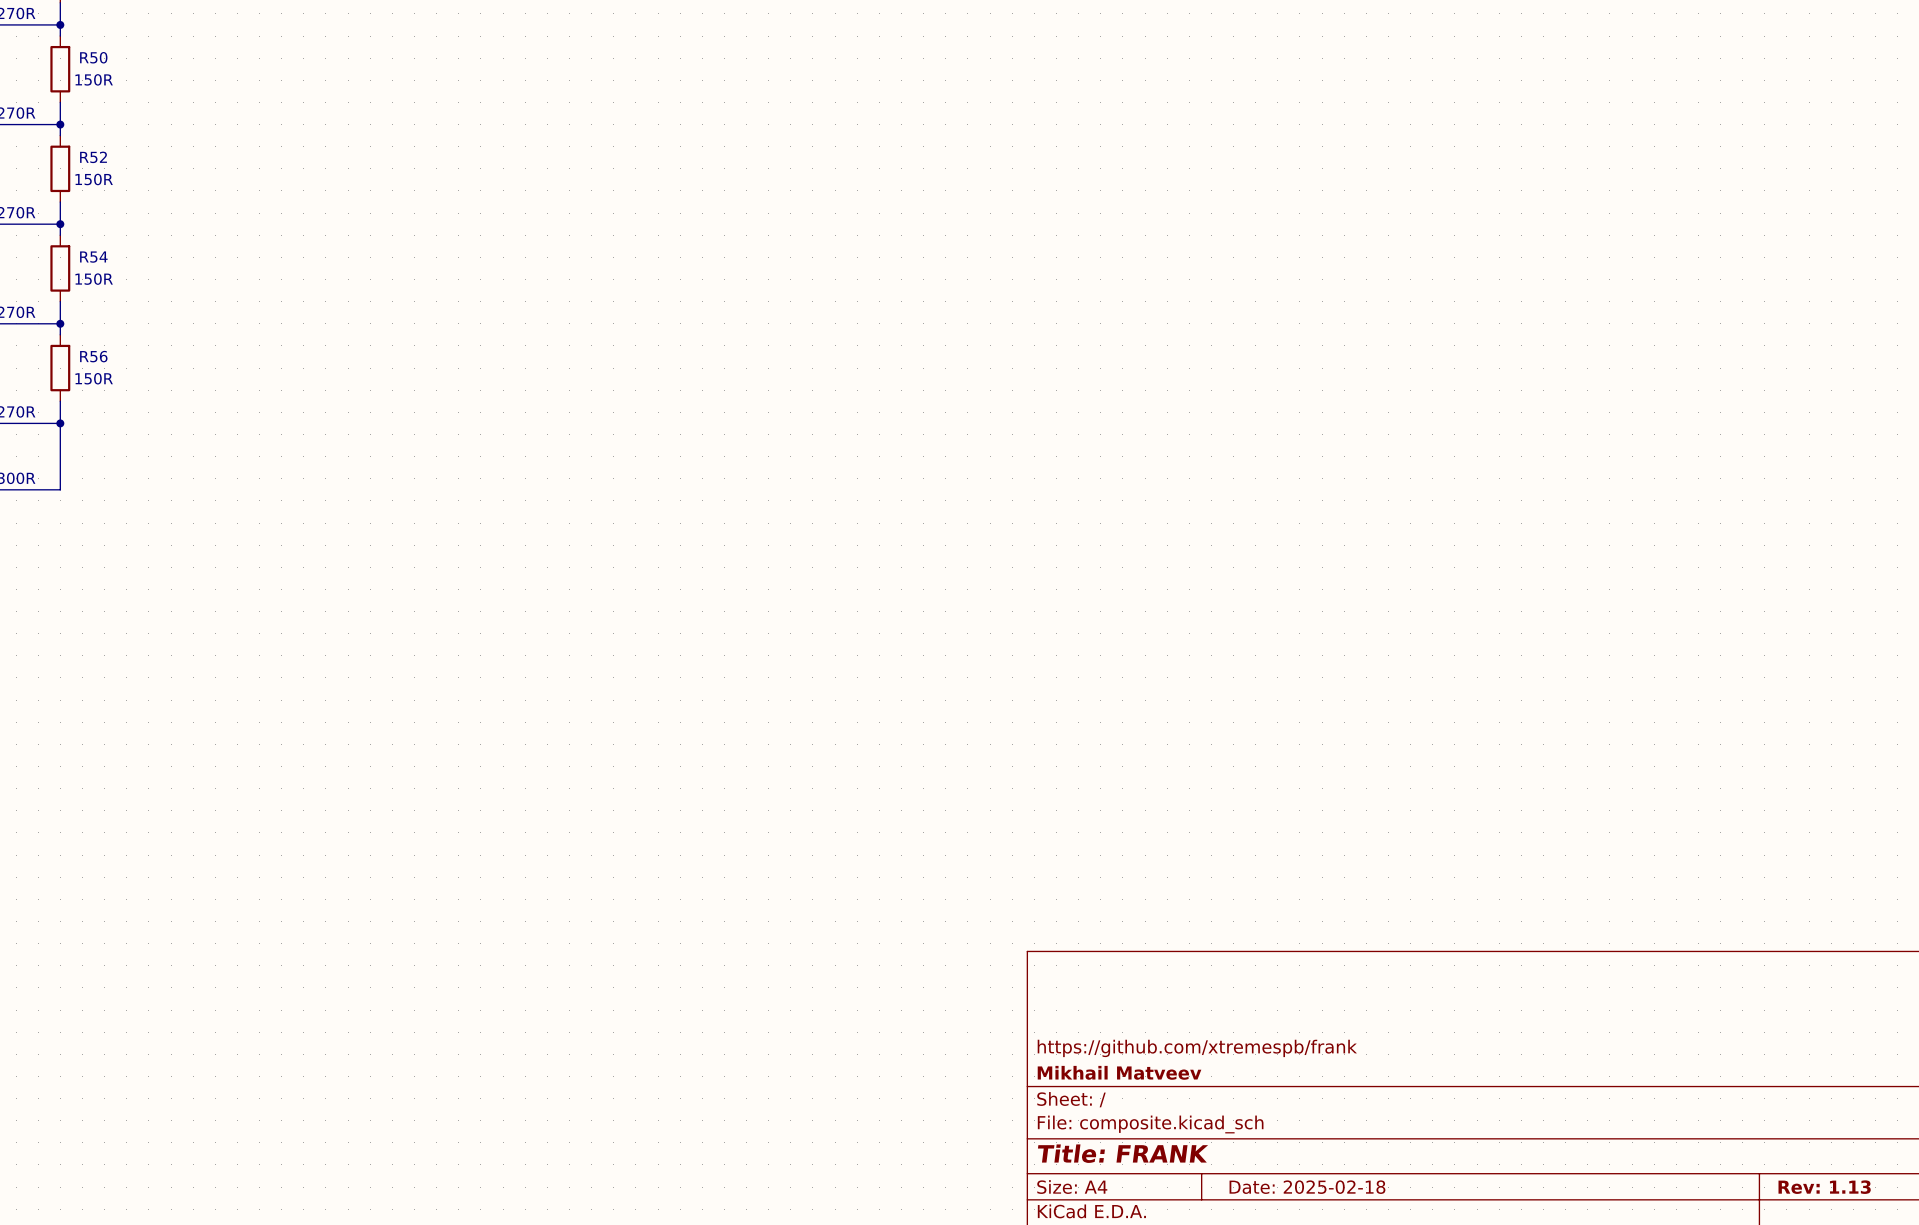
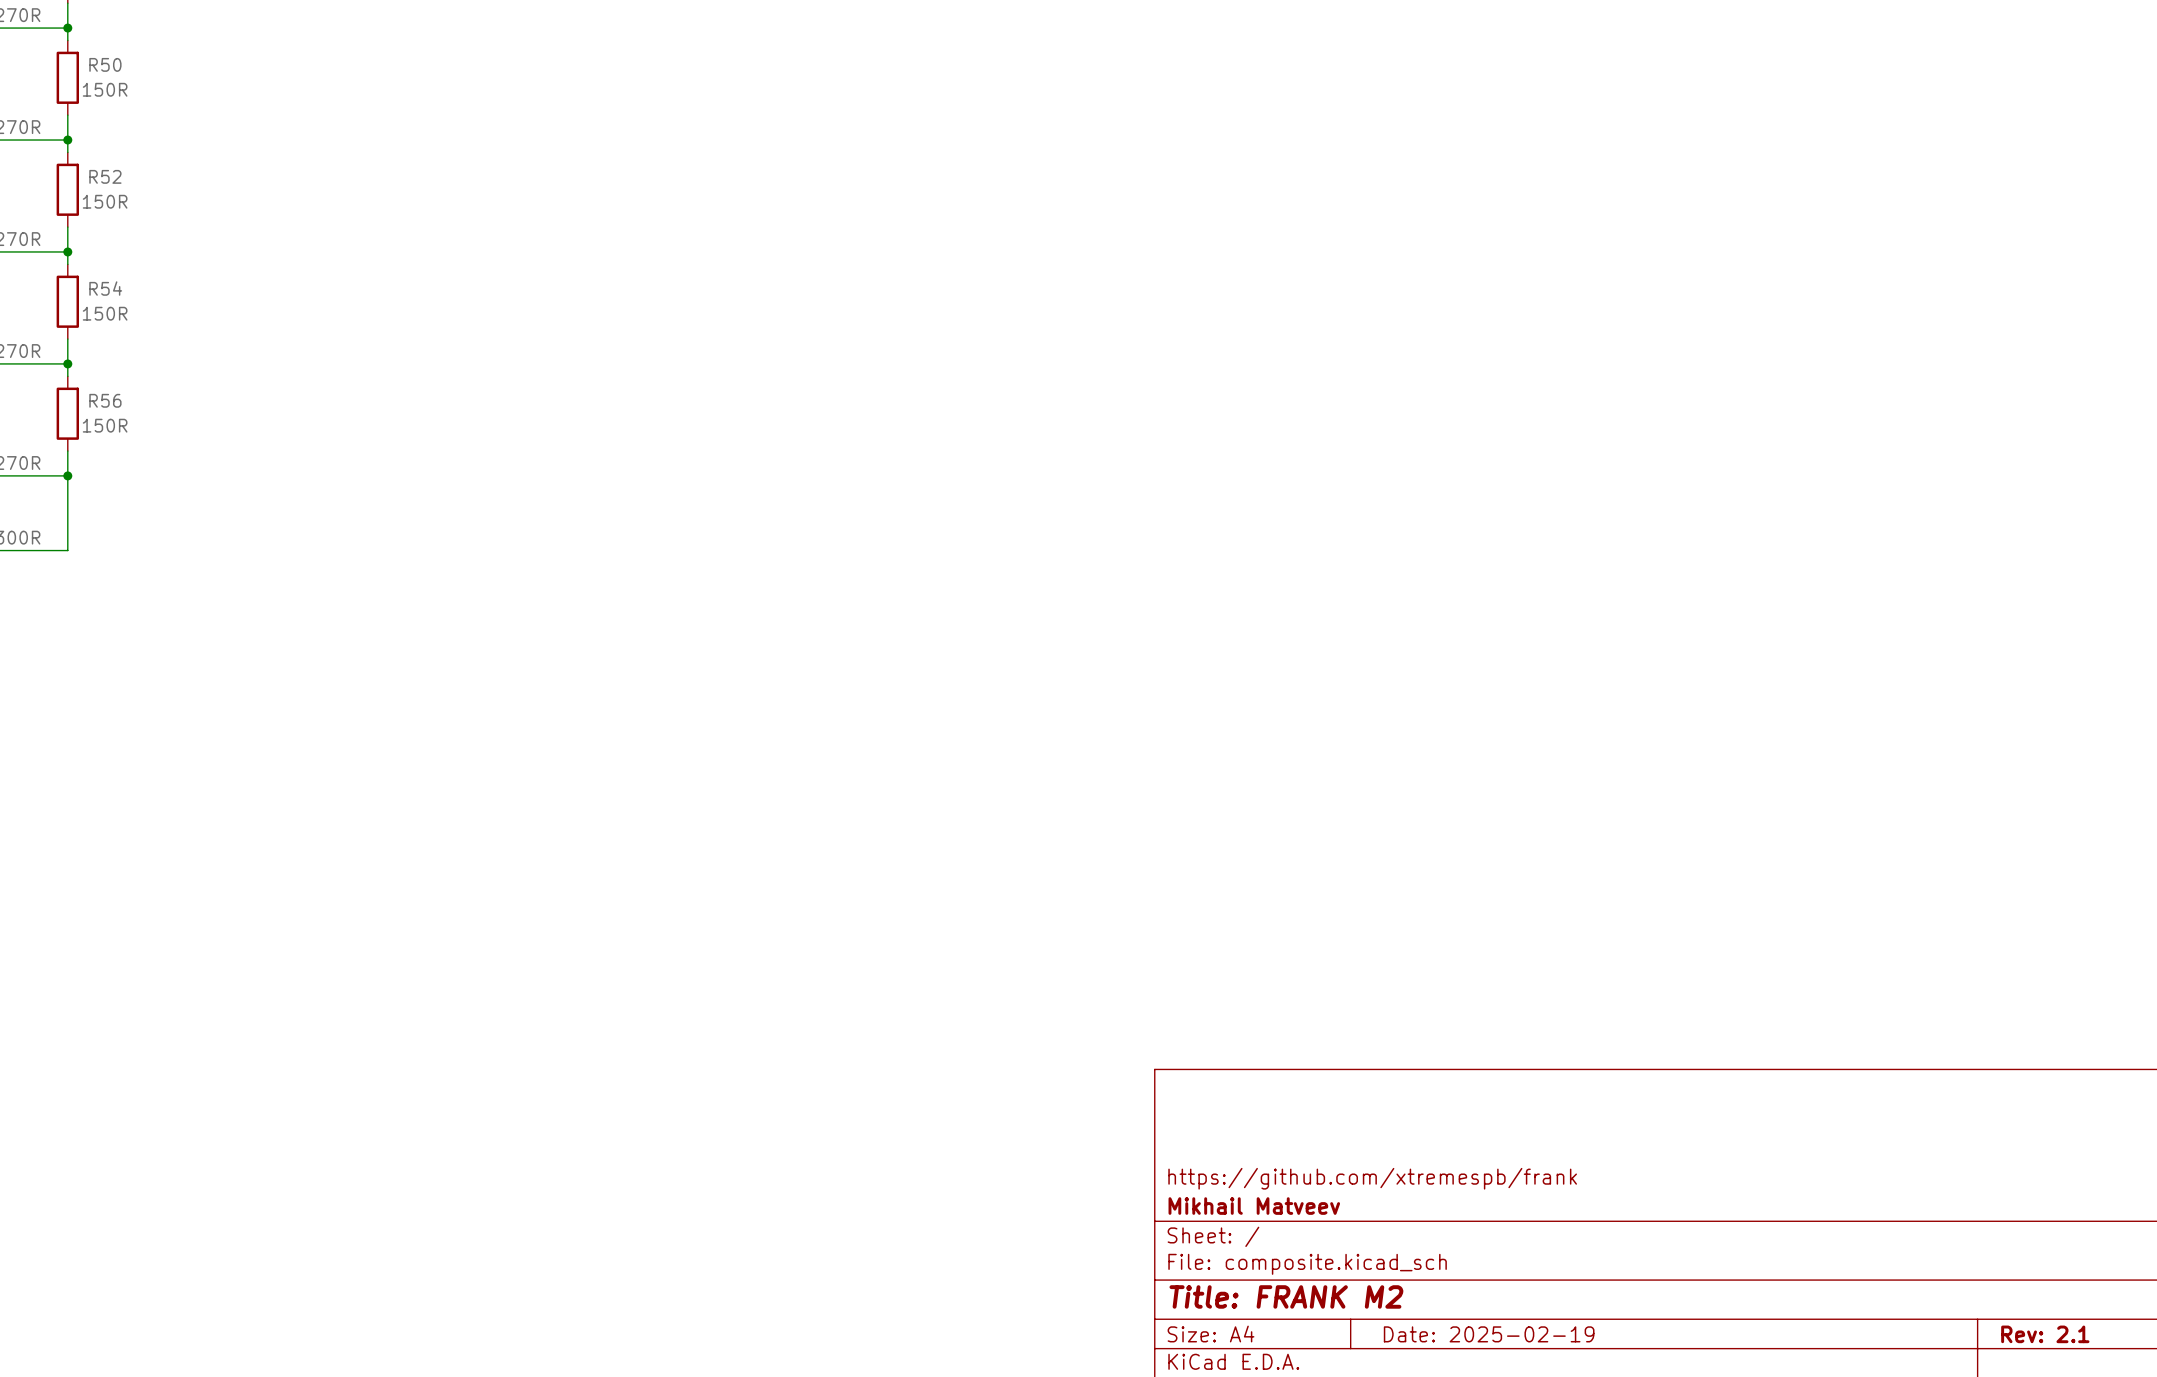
title block: Title: FRANK (1123, 1153) -> Title: FRANK M2 (1286, 1296)
title block: Date: 2025-02-18 (1307, 1187) -> Date: 2025-02-19 (1489, 1334)
title block: Rev: 1.13 (1824, 1187) -> Rev: 2.1 (2045, 1334)

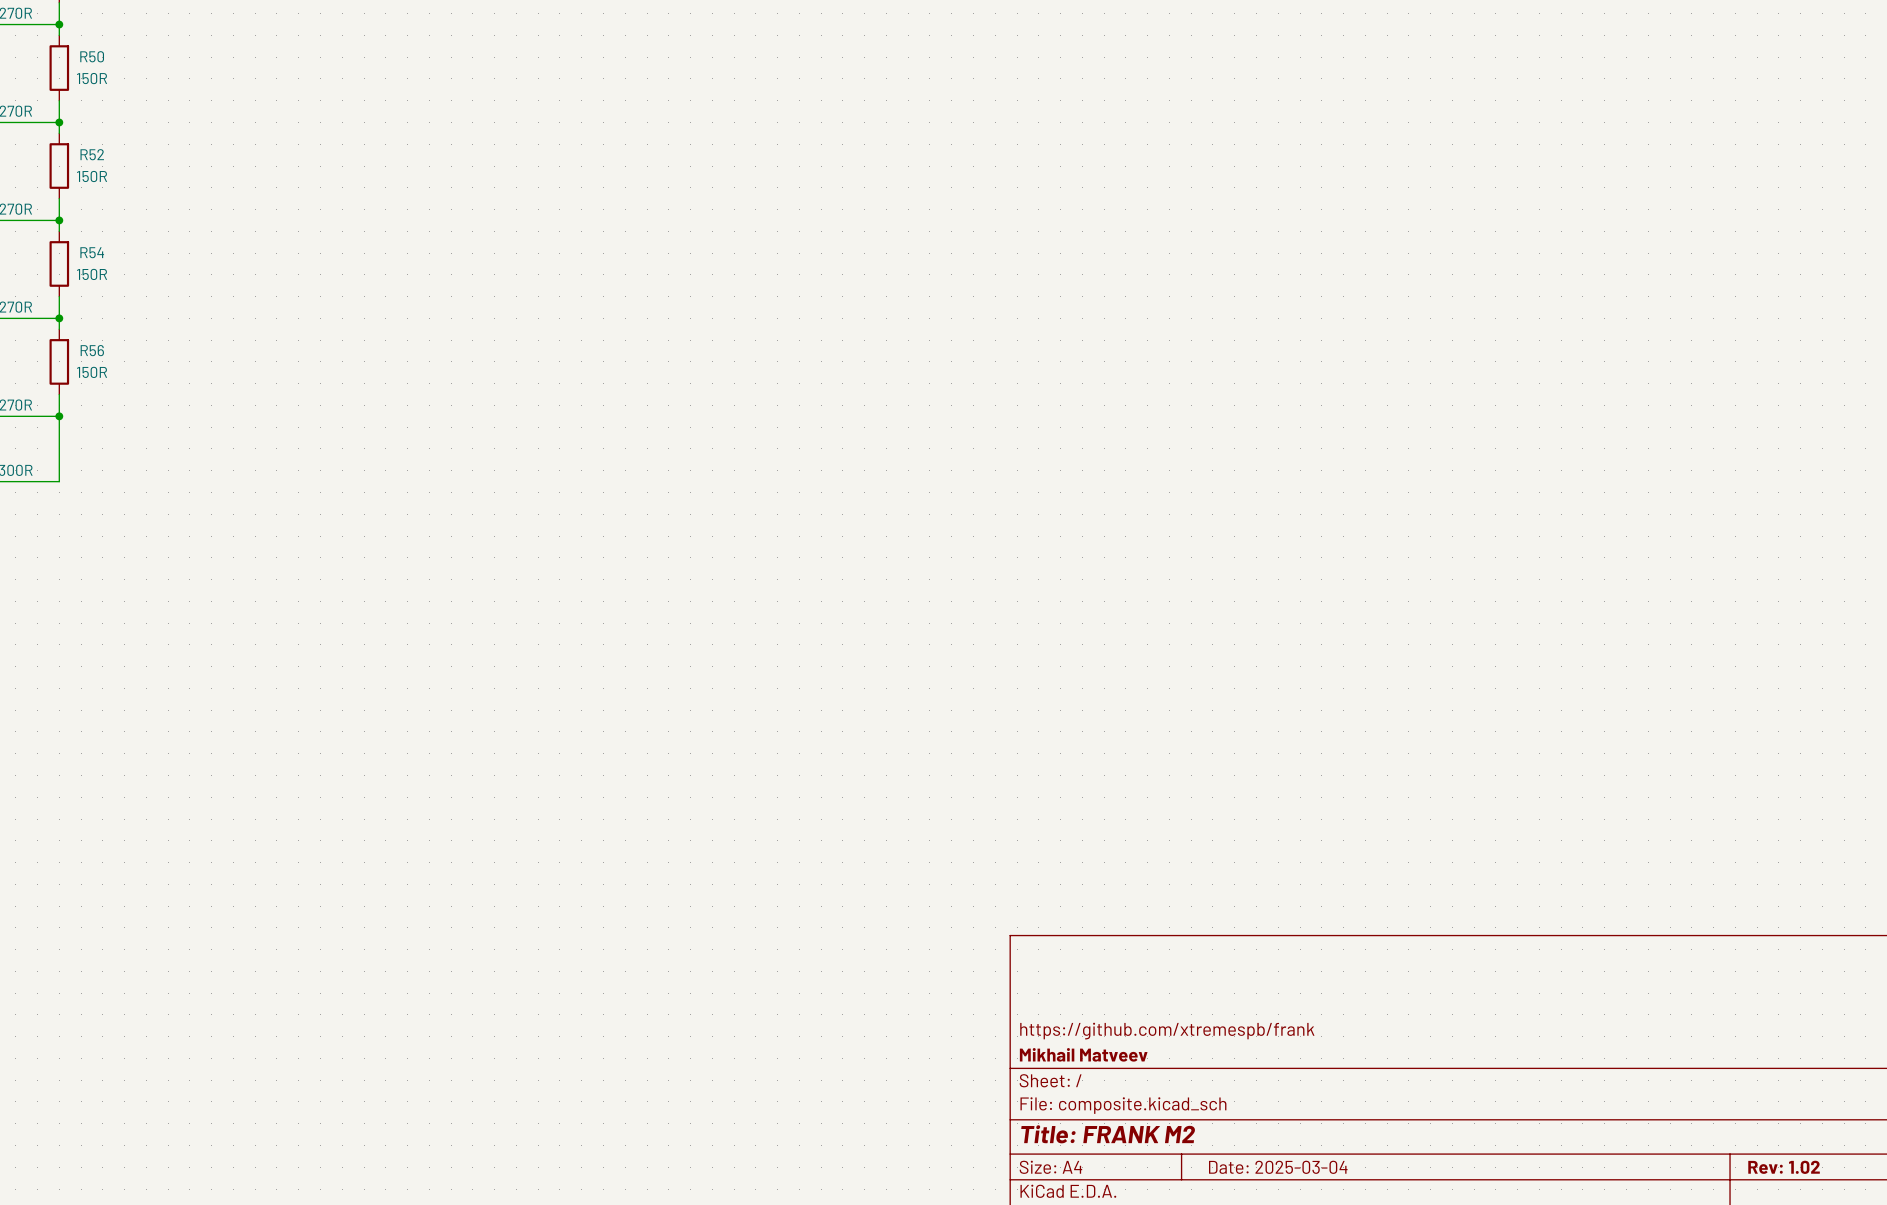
title block: Date: 2025-02-19 (1489, 1334) -> Date: 2025-03-04 (1278, 1167)
title block: Rev: 2.1 (2045, 1334) -> Rev: 1.02 (1784, 1167)

